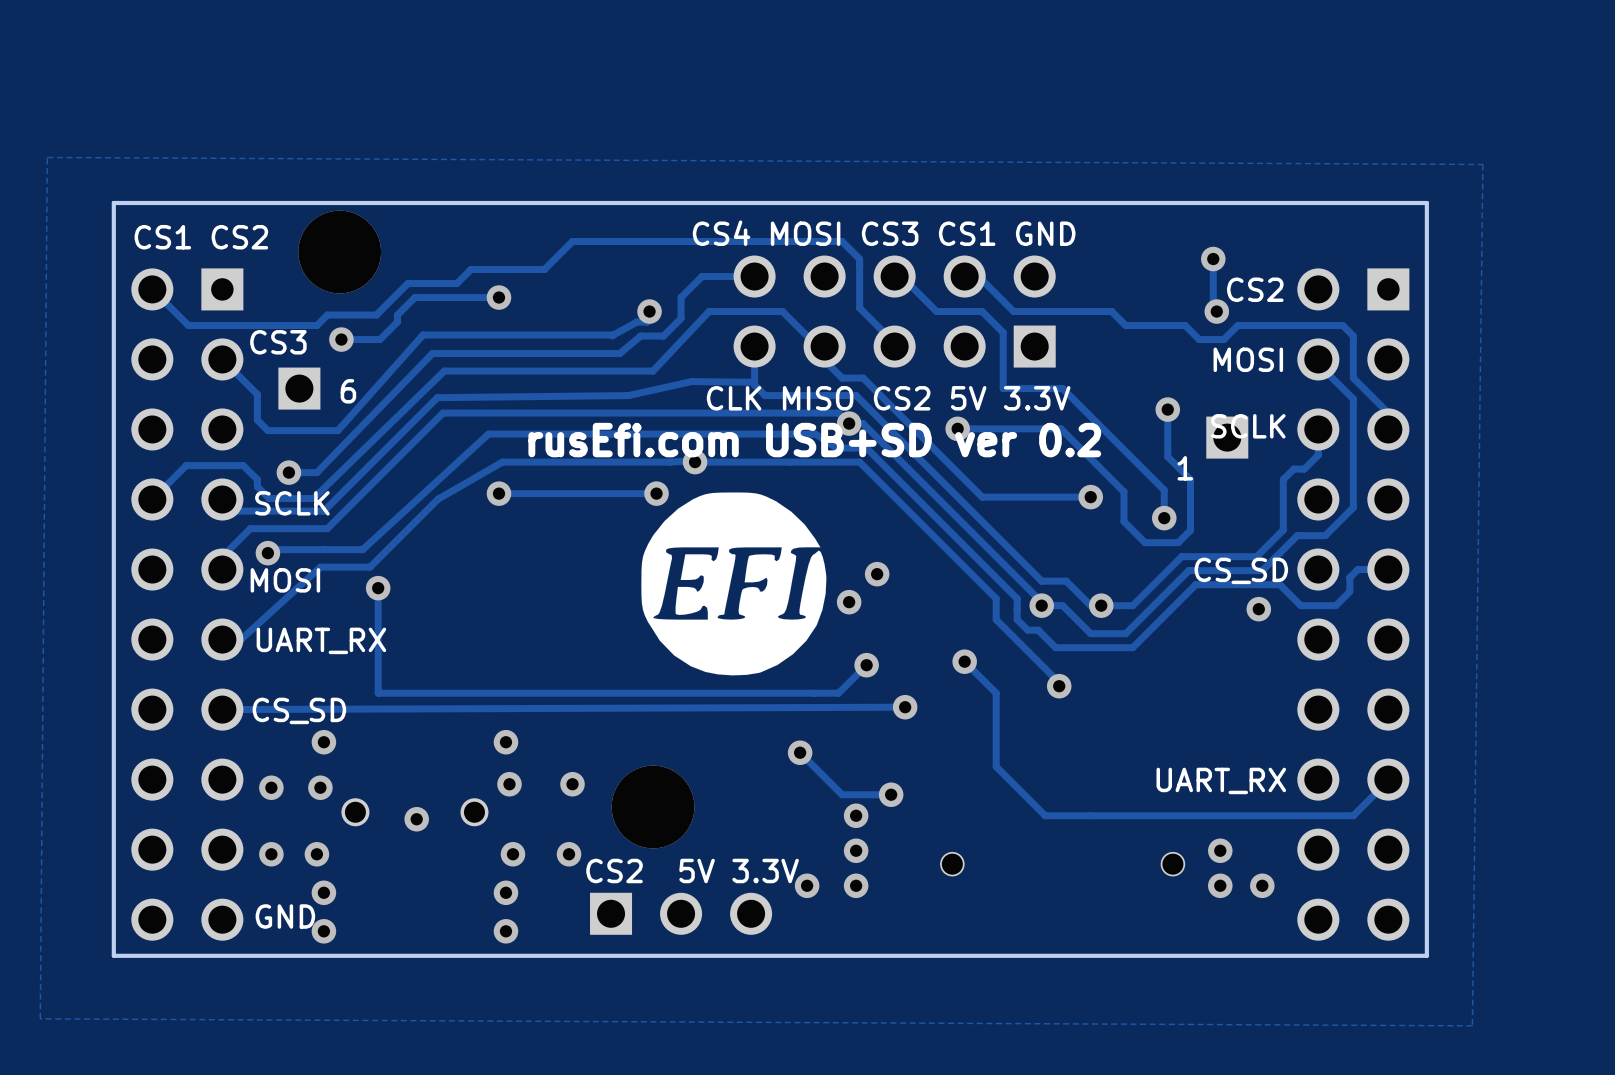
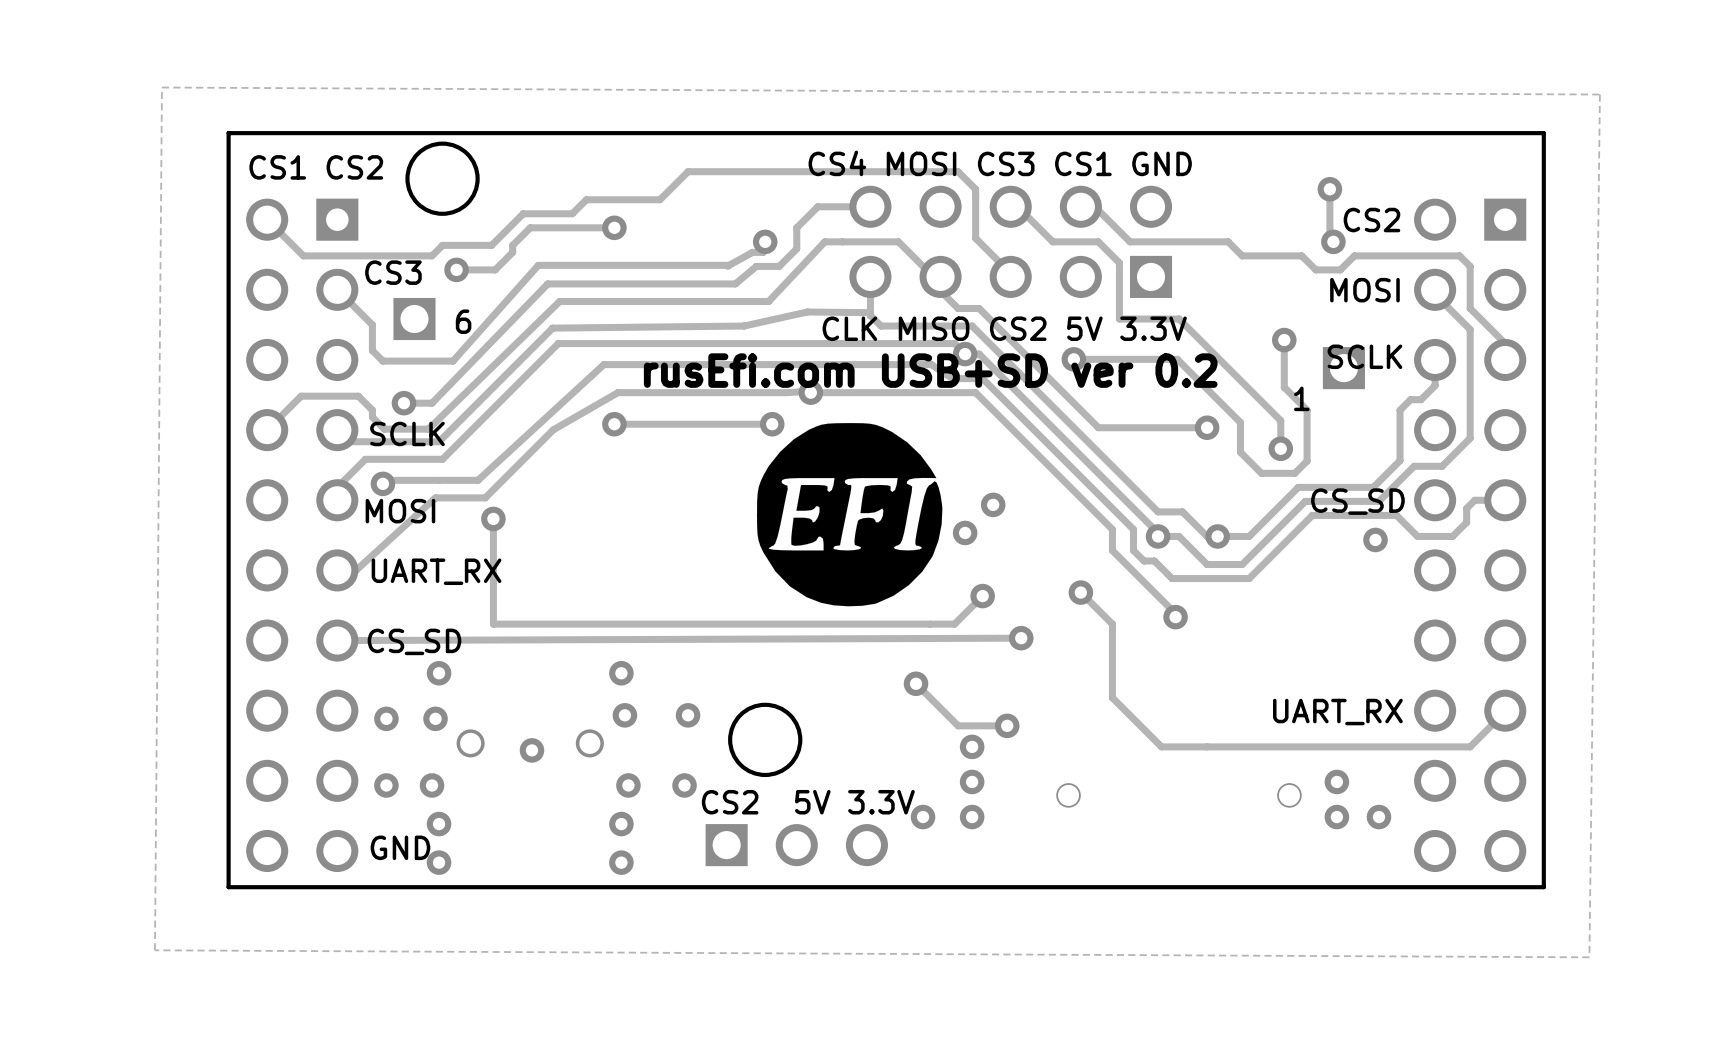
round board edge: none -> [405, 141, 480, 216]
part: (339, 252) -> none
round board edge: none -> [728, 702, 803, 778]
part: (653, 807) -> none

